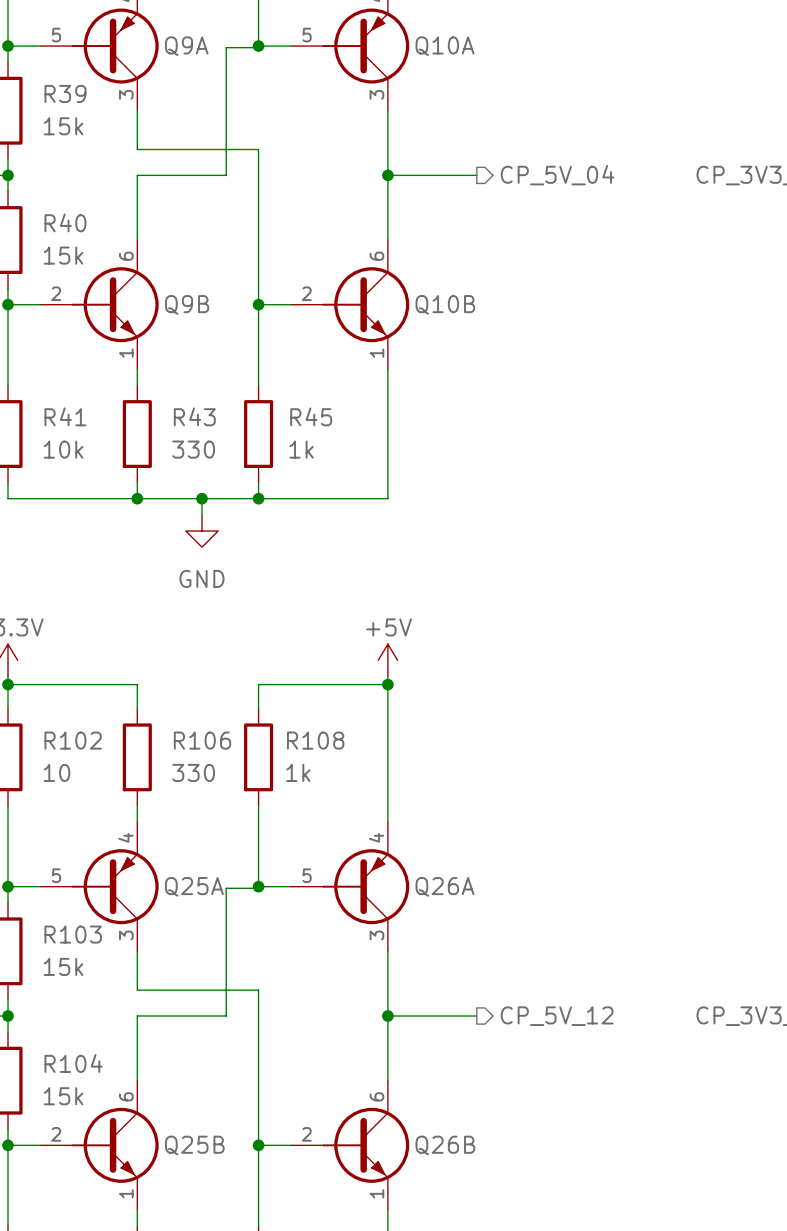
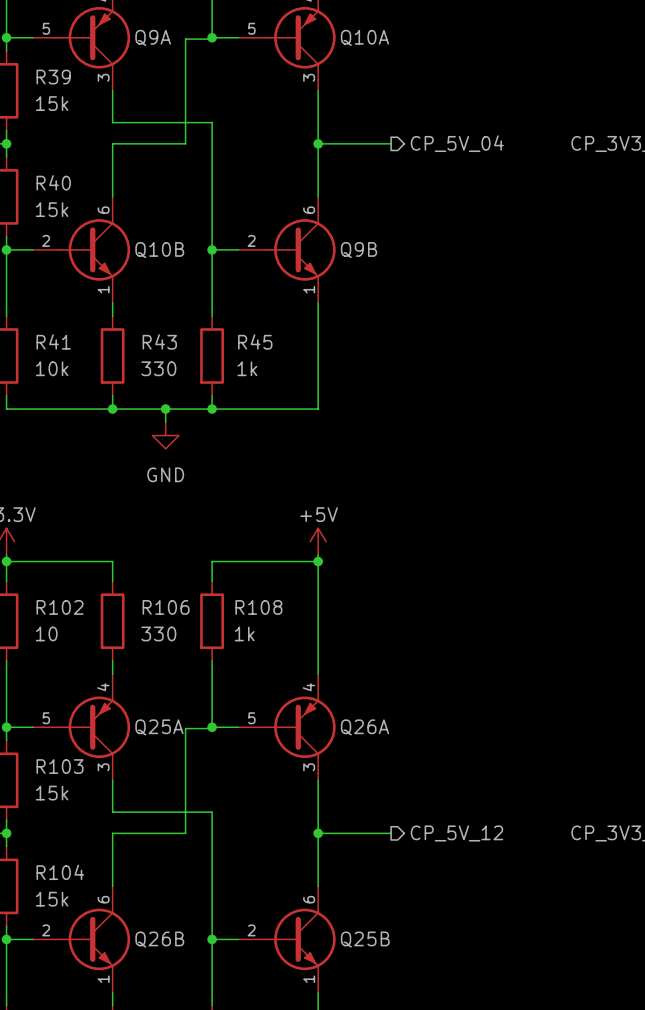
Q9B name: Q9B (187, 304) -> Q10B (159, 250)
Q10B name: Q10B (445, 304) -> Q9B (358, 250)
Q25B name: Q25B (194, 1145) -> Q26B (159, 939)
Q26B name: Q26B (445, 1145) -> Q25B (365, 939)

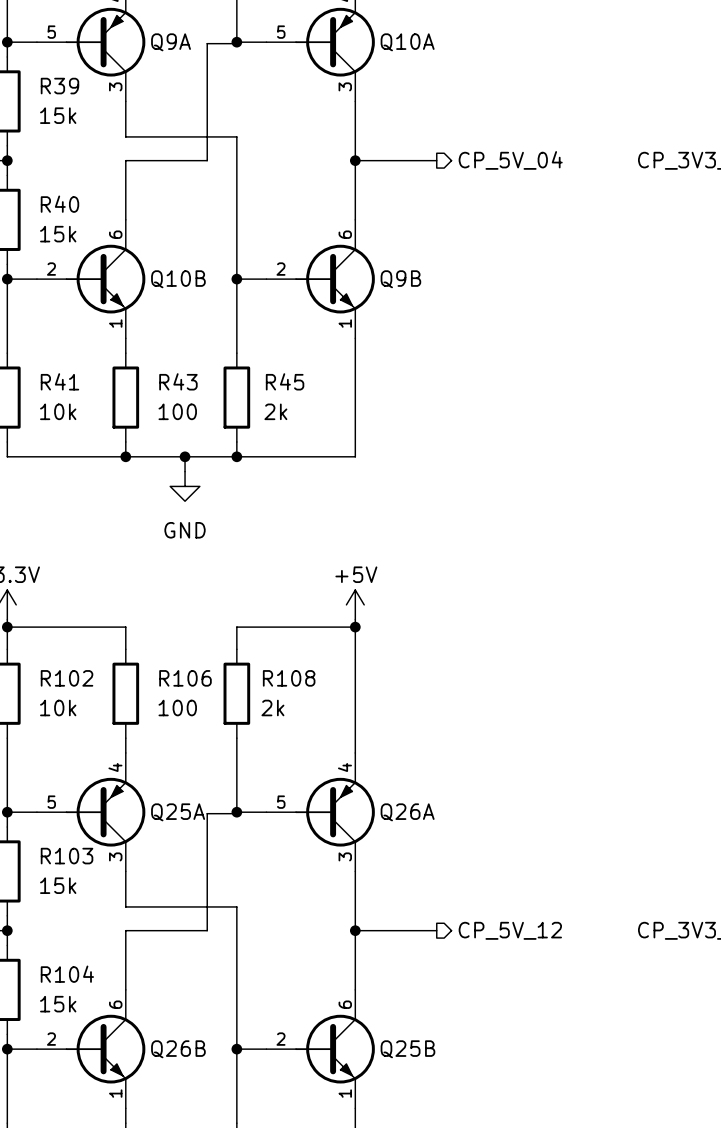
R43 value: 330 (158, 368) -> 100 (177, 411)
R45 value: 1k (247, 368) -> 2k (275, 411)
R102 value: 10 (46, 633) -> 10k (58, 707)
R106 value: 330 (158, 633) -> 100 (177, 707)
R108 value: 1k (244, 633) -> 2k (272, 707)

